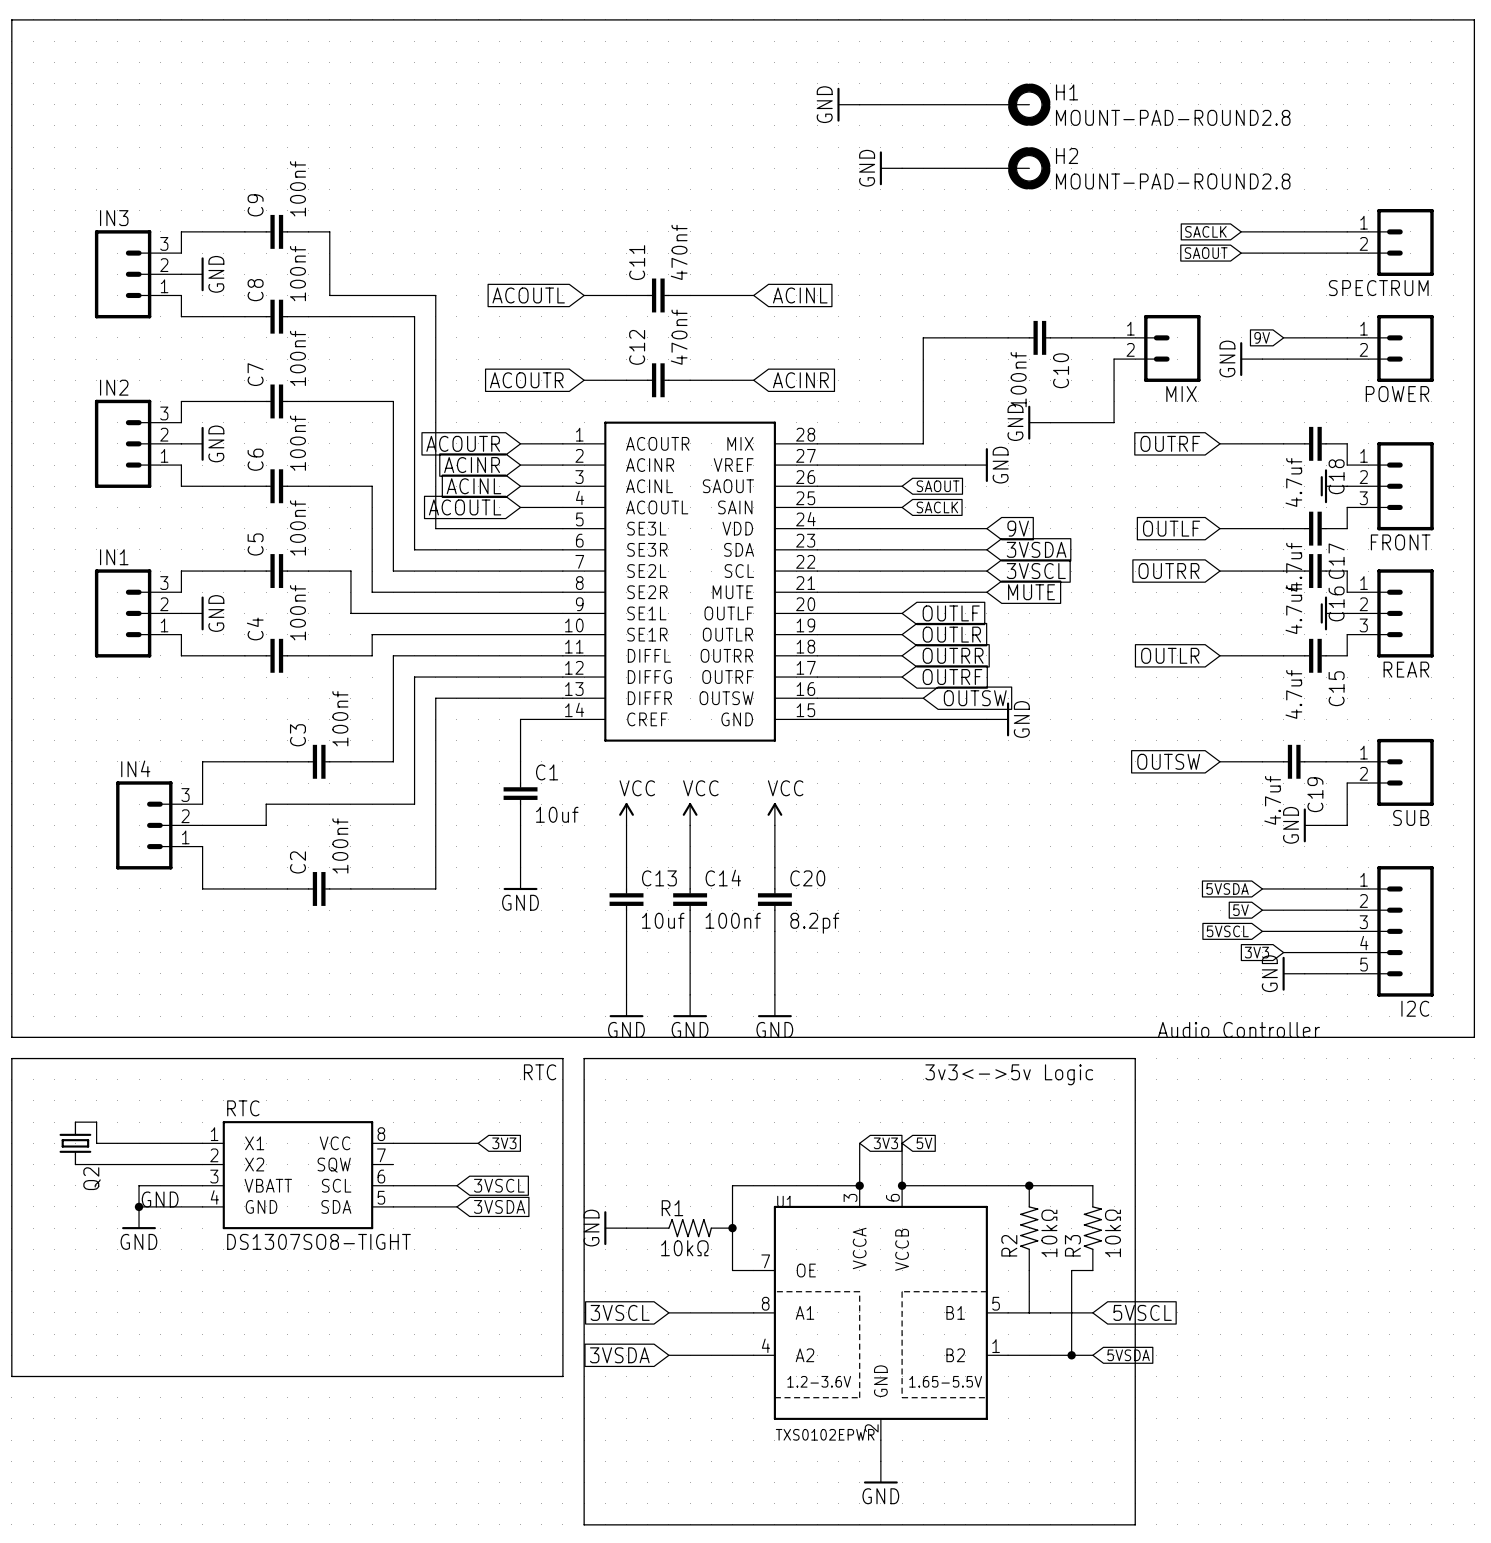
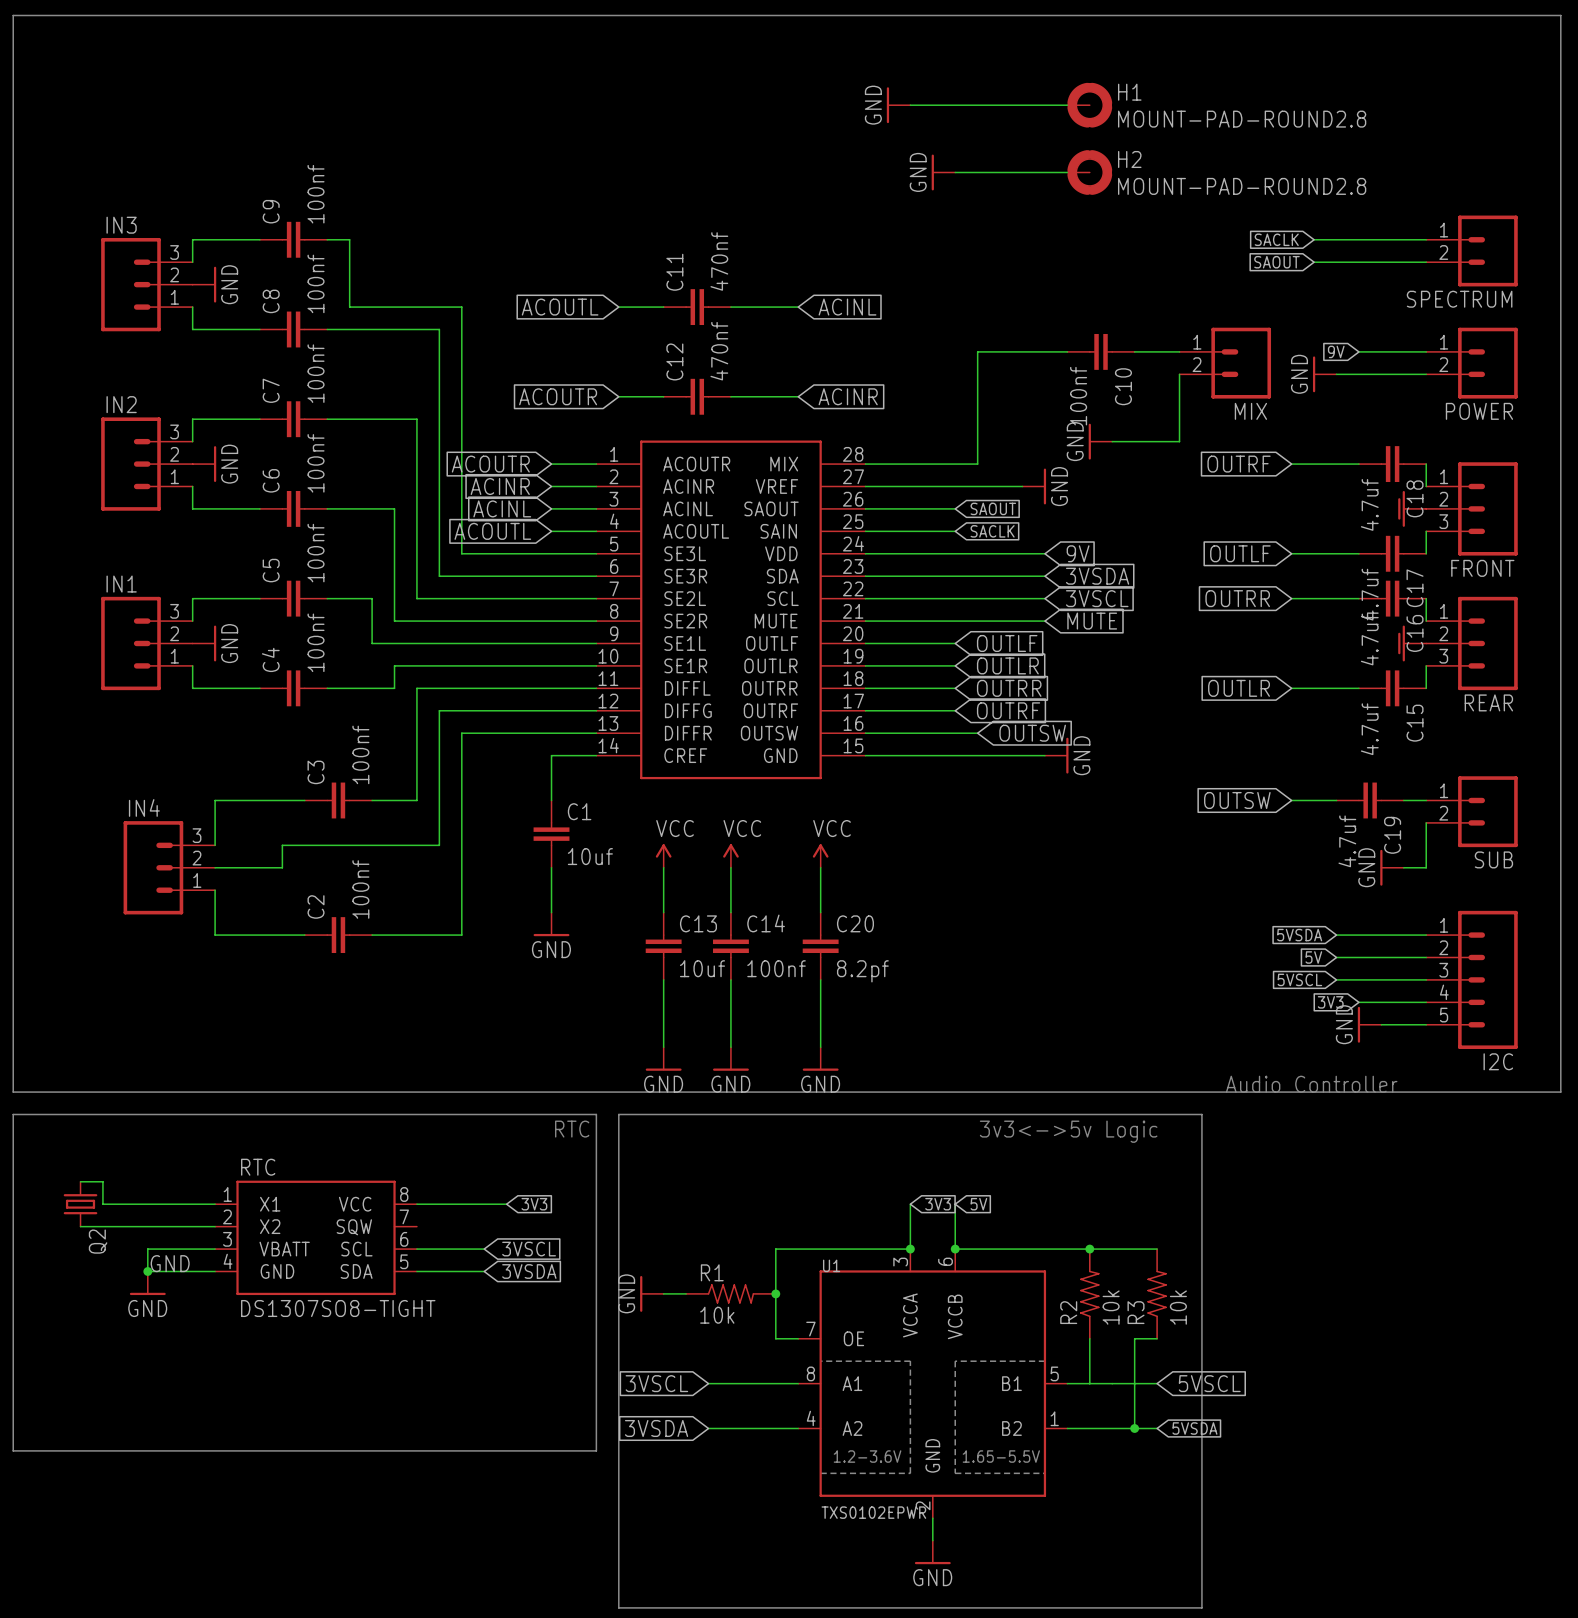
R2 value: 10kΩ (1049, 1233) -> 10k (1111, 1307)
R3 value: 10kΩ (1112, 1233) -> 10k (1178, 1307)
R1 value: 10kΩ (684, 1248) -> 10k (717, 1315)

